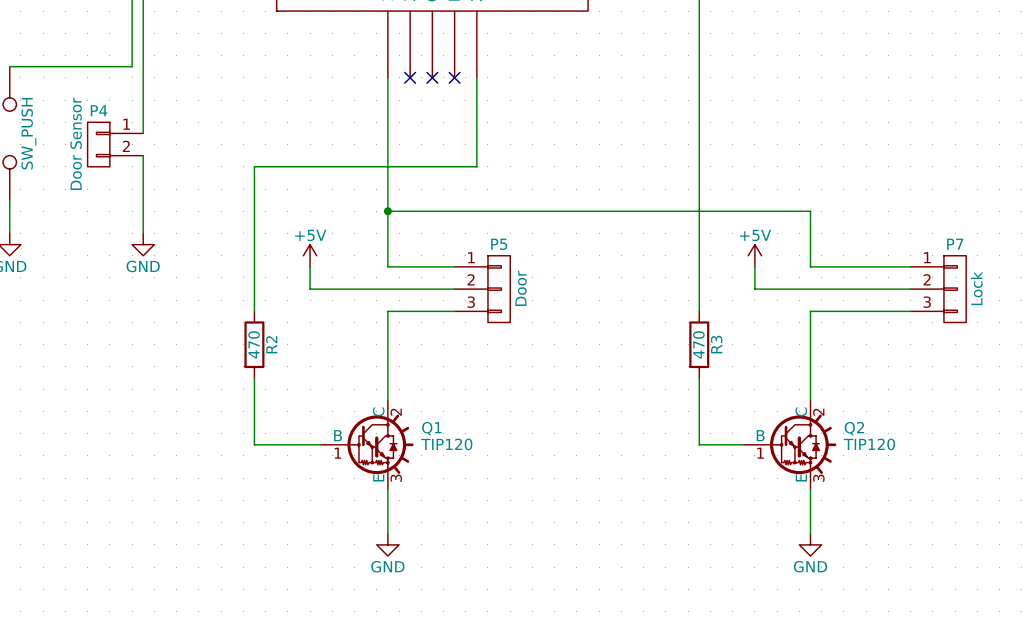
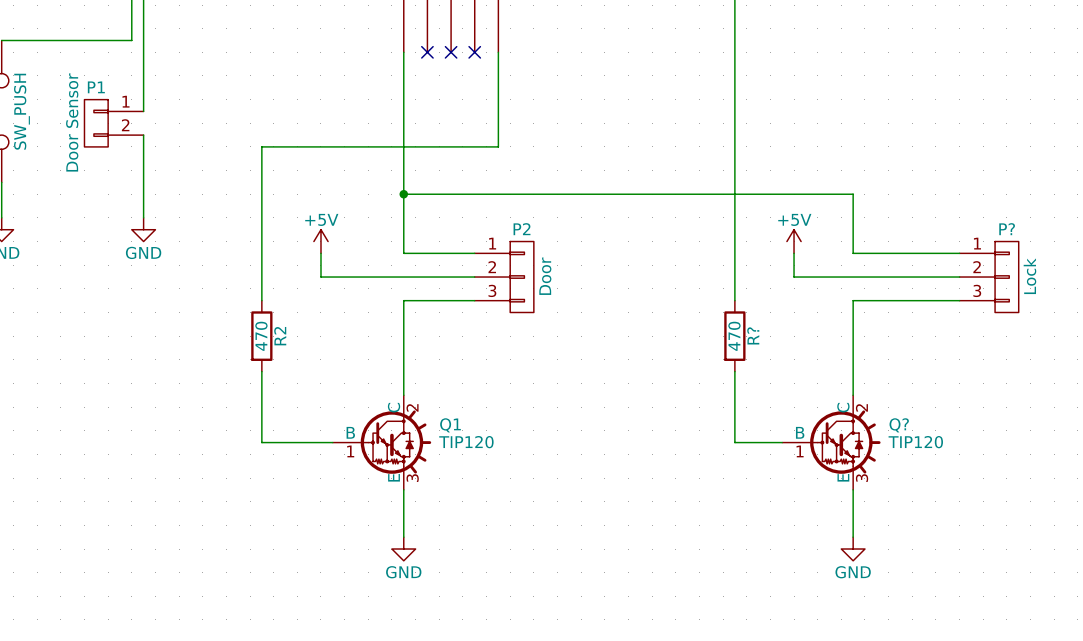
P4 name: P4 (99, 110) -> P1 (96, 87)
P5 name: P5 (499, 244) -> P2 (522, 229)
P7 name: P7 (955, 244) -> P? (1007, 229)
R3 name: R3 (716, 344) -> R? (753, 335)
Q2 name: Q2 (854, 428) -> Q? (899, 425)

